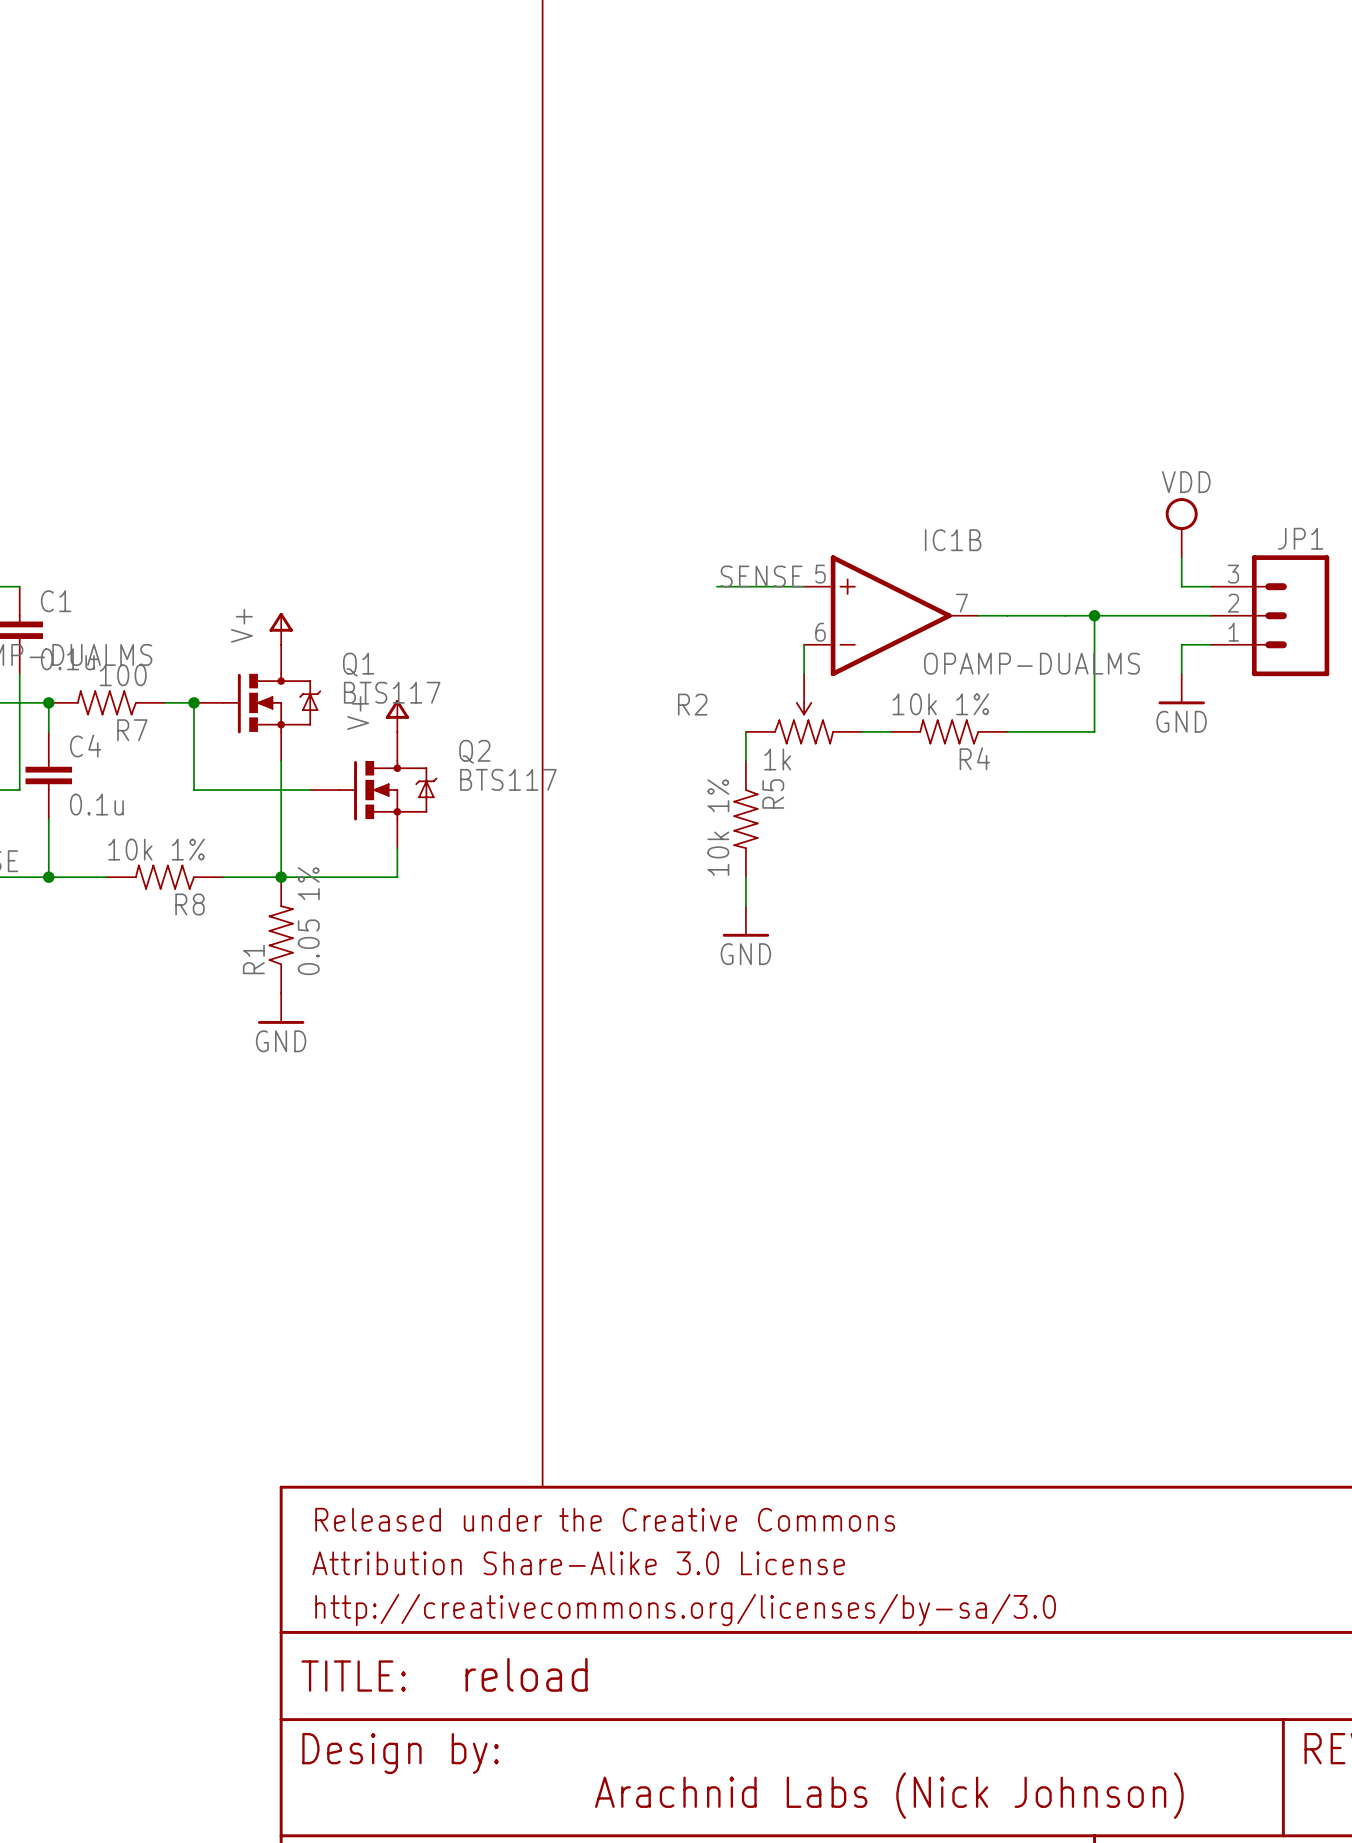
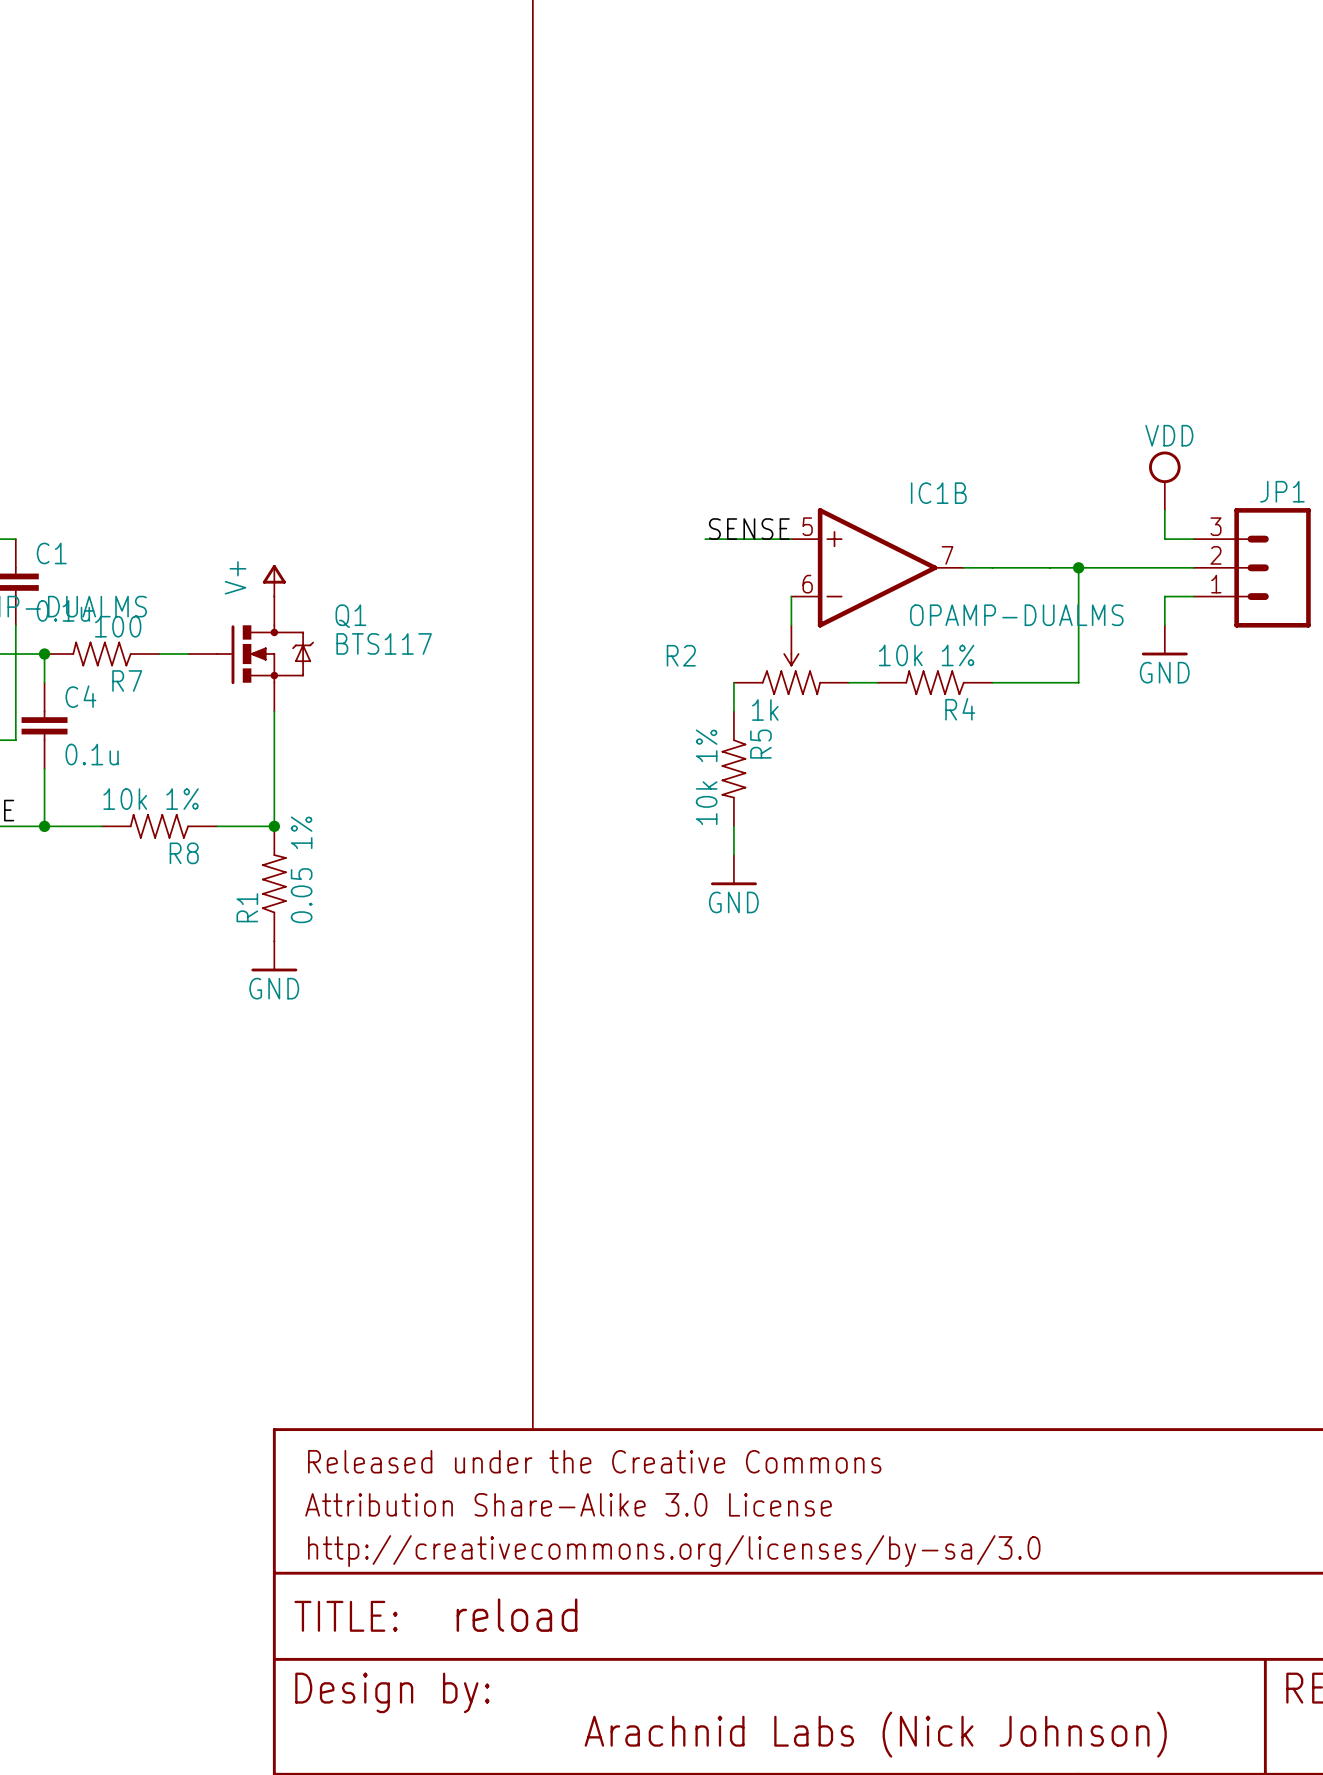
wire: (194, 702) (194, 790) (310, 790) -> none
junction: (194, 702) -> none
power symbol: V+ (397, 715) -> none
Q2: BTS117 (373, 790) -> none
wire: (397, 848) (397, 877) (281, 877) -> none

